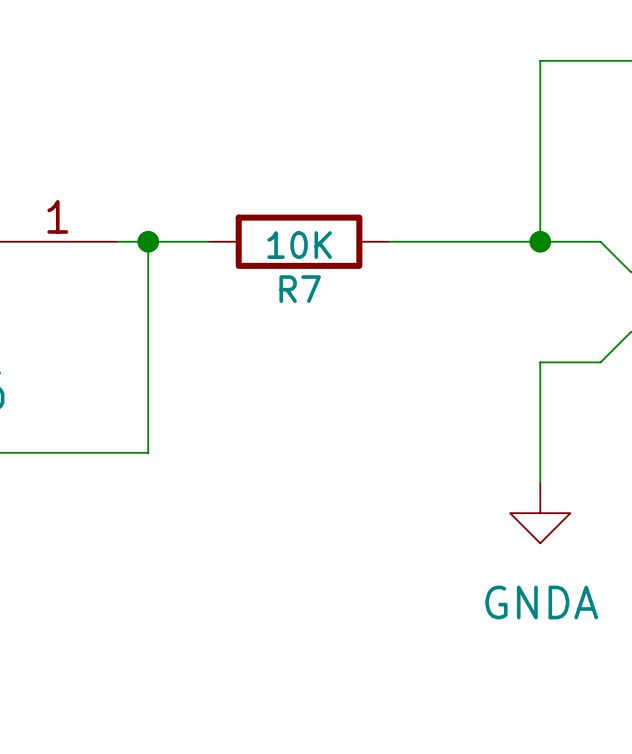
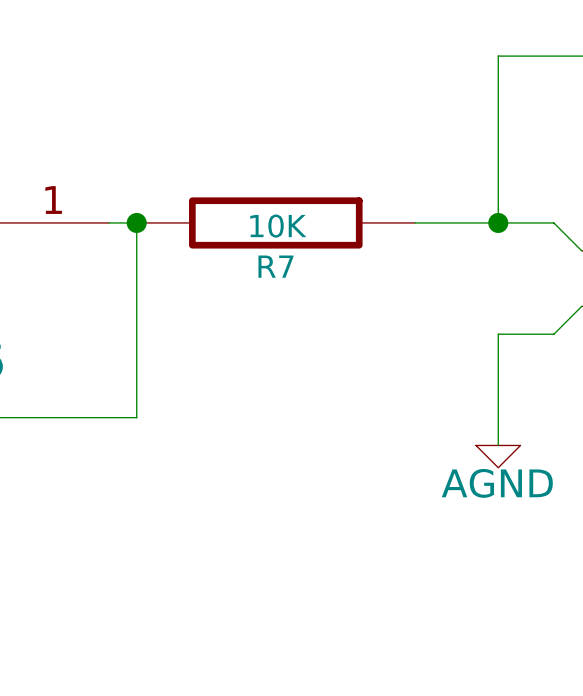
R7 symbol: [208, 214, 390, 269] -> [136, 197, 415, 249]
power symbol: GNDA (540, 513) -> AGND (498, 456)

